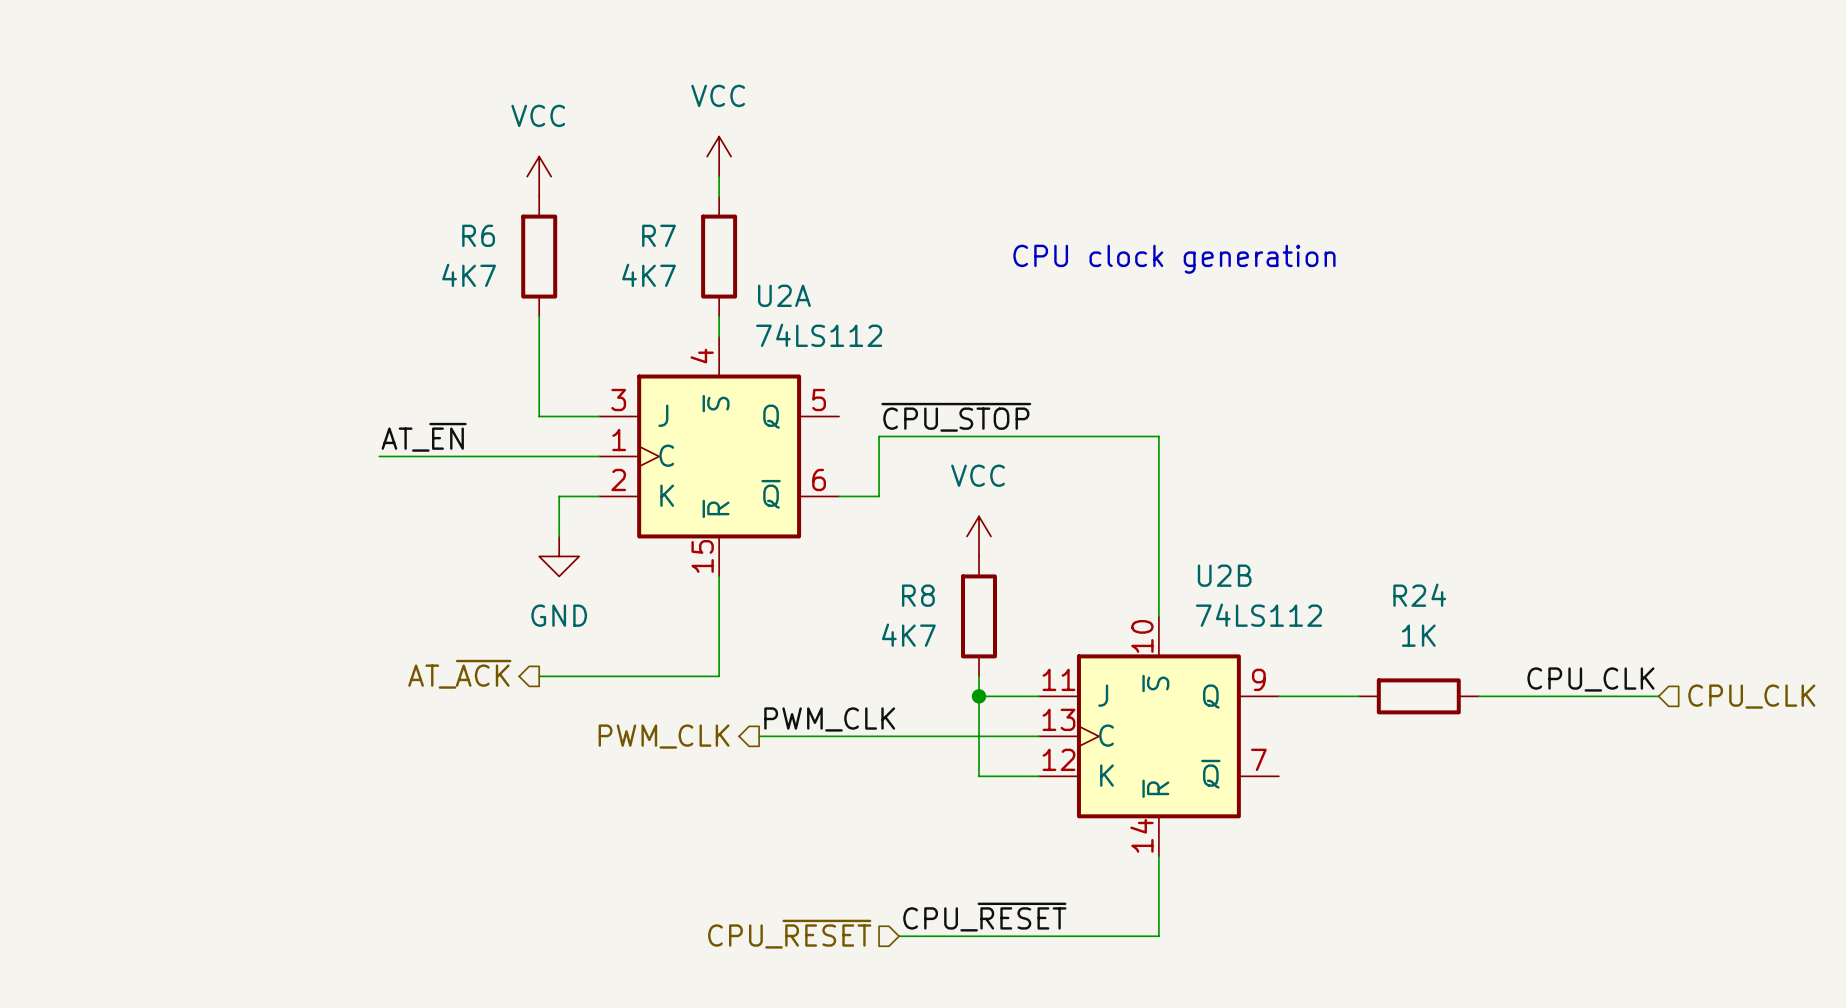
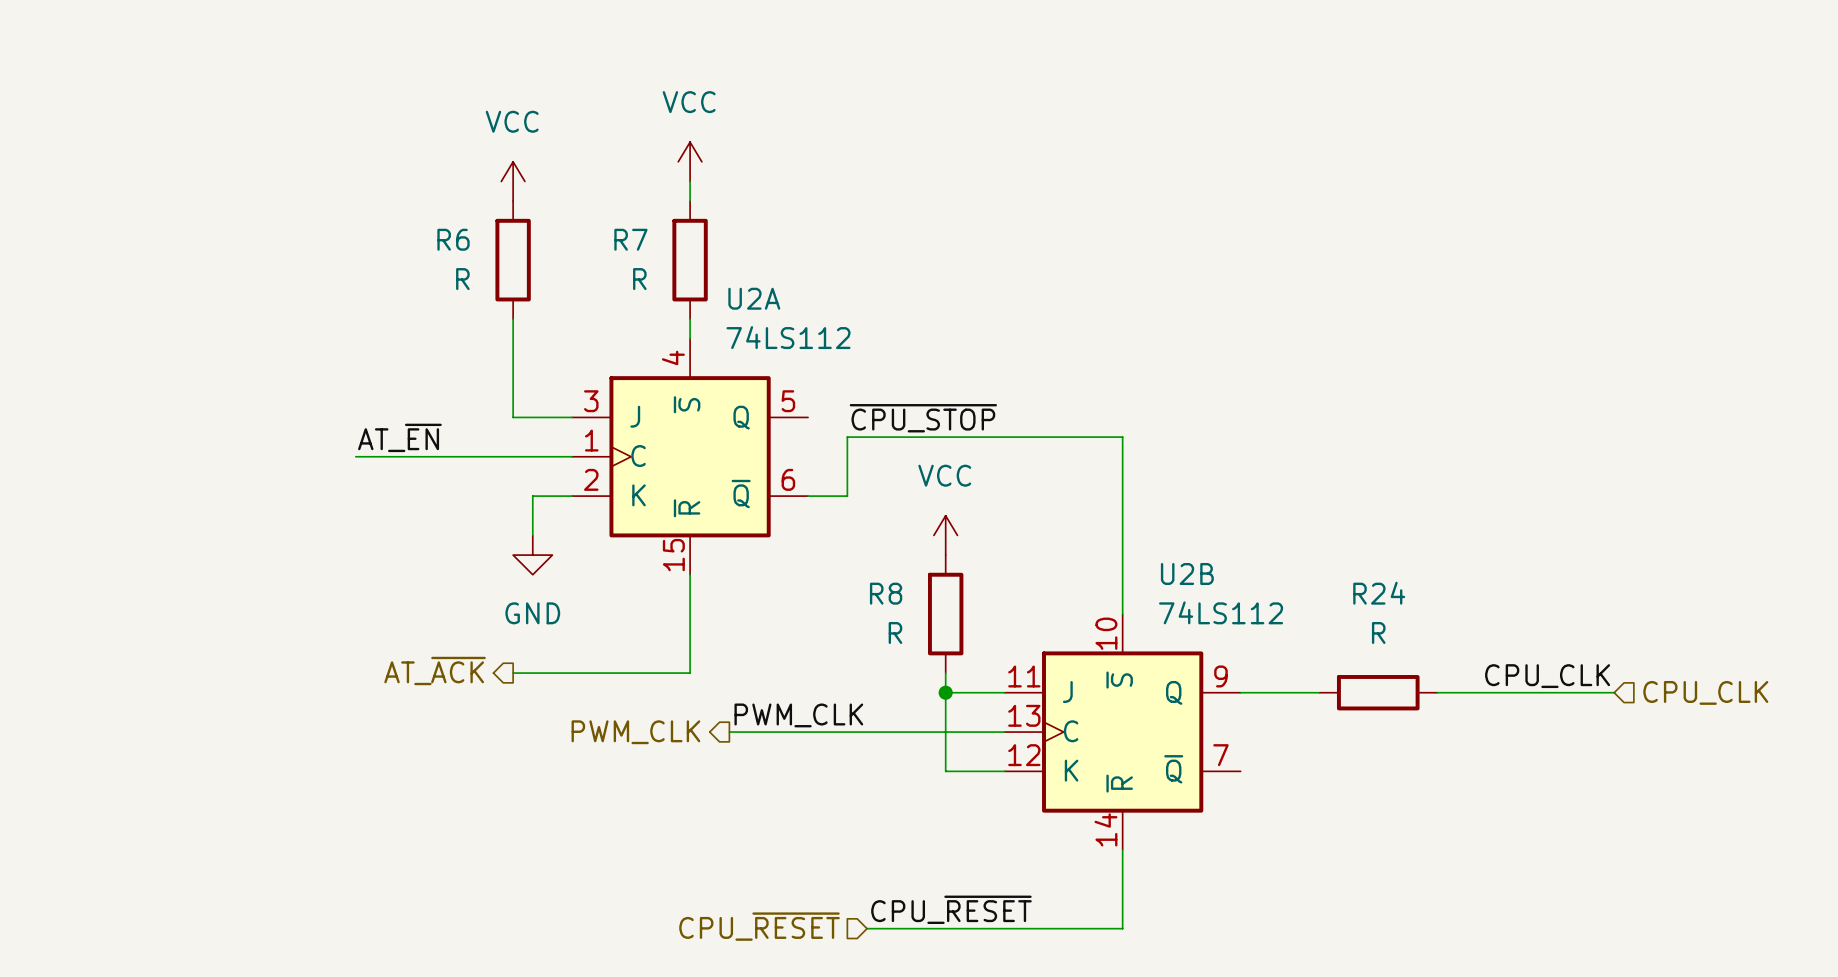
text: CPU clock generation (1174, 259) -> none
R6 value: 4K7 (469, 275) -> R (462, 279)
R7 value: 4K7 (649, 275) -> R (639, 279)
R8 value: 4K7 (908, 635) -> R (895, 632)
R24 value: 1K (1418, 635) -> R (1378, 632)

